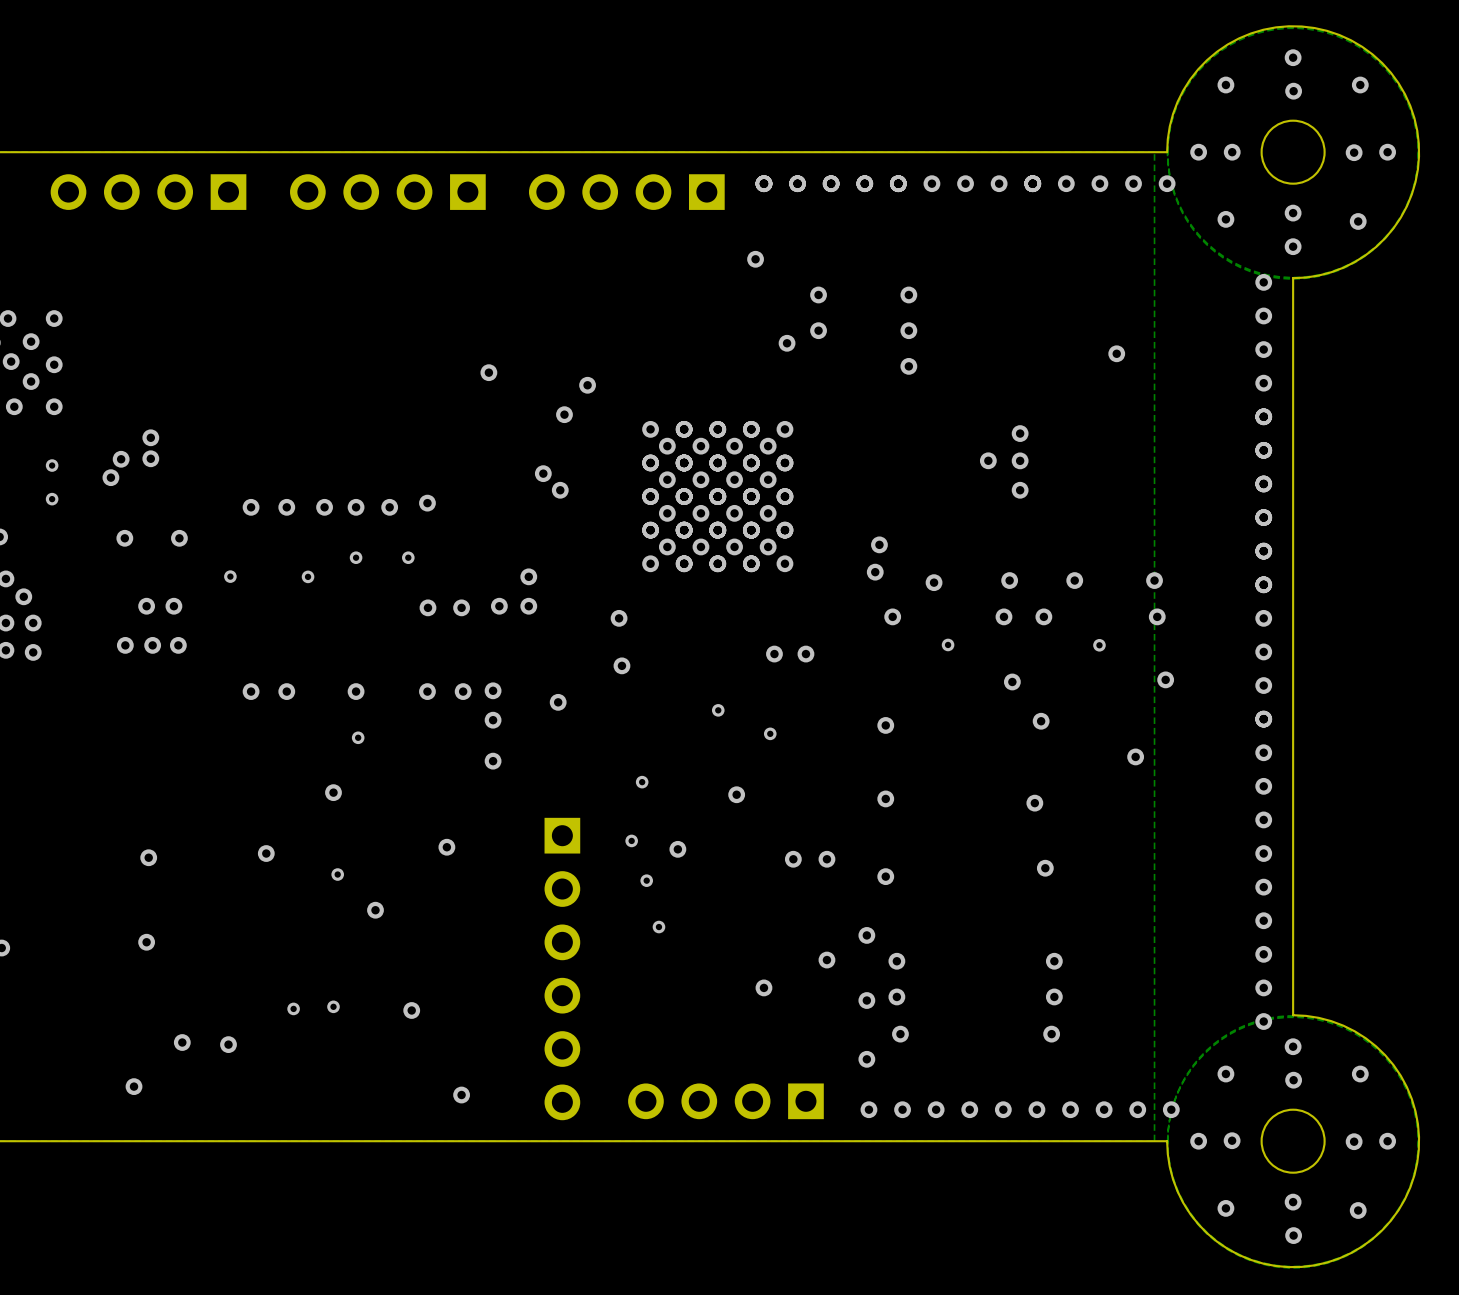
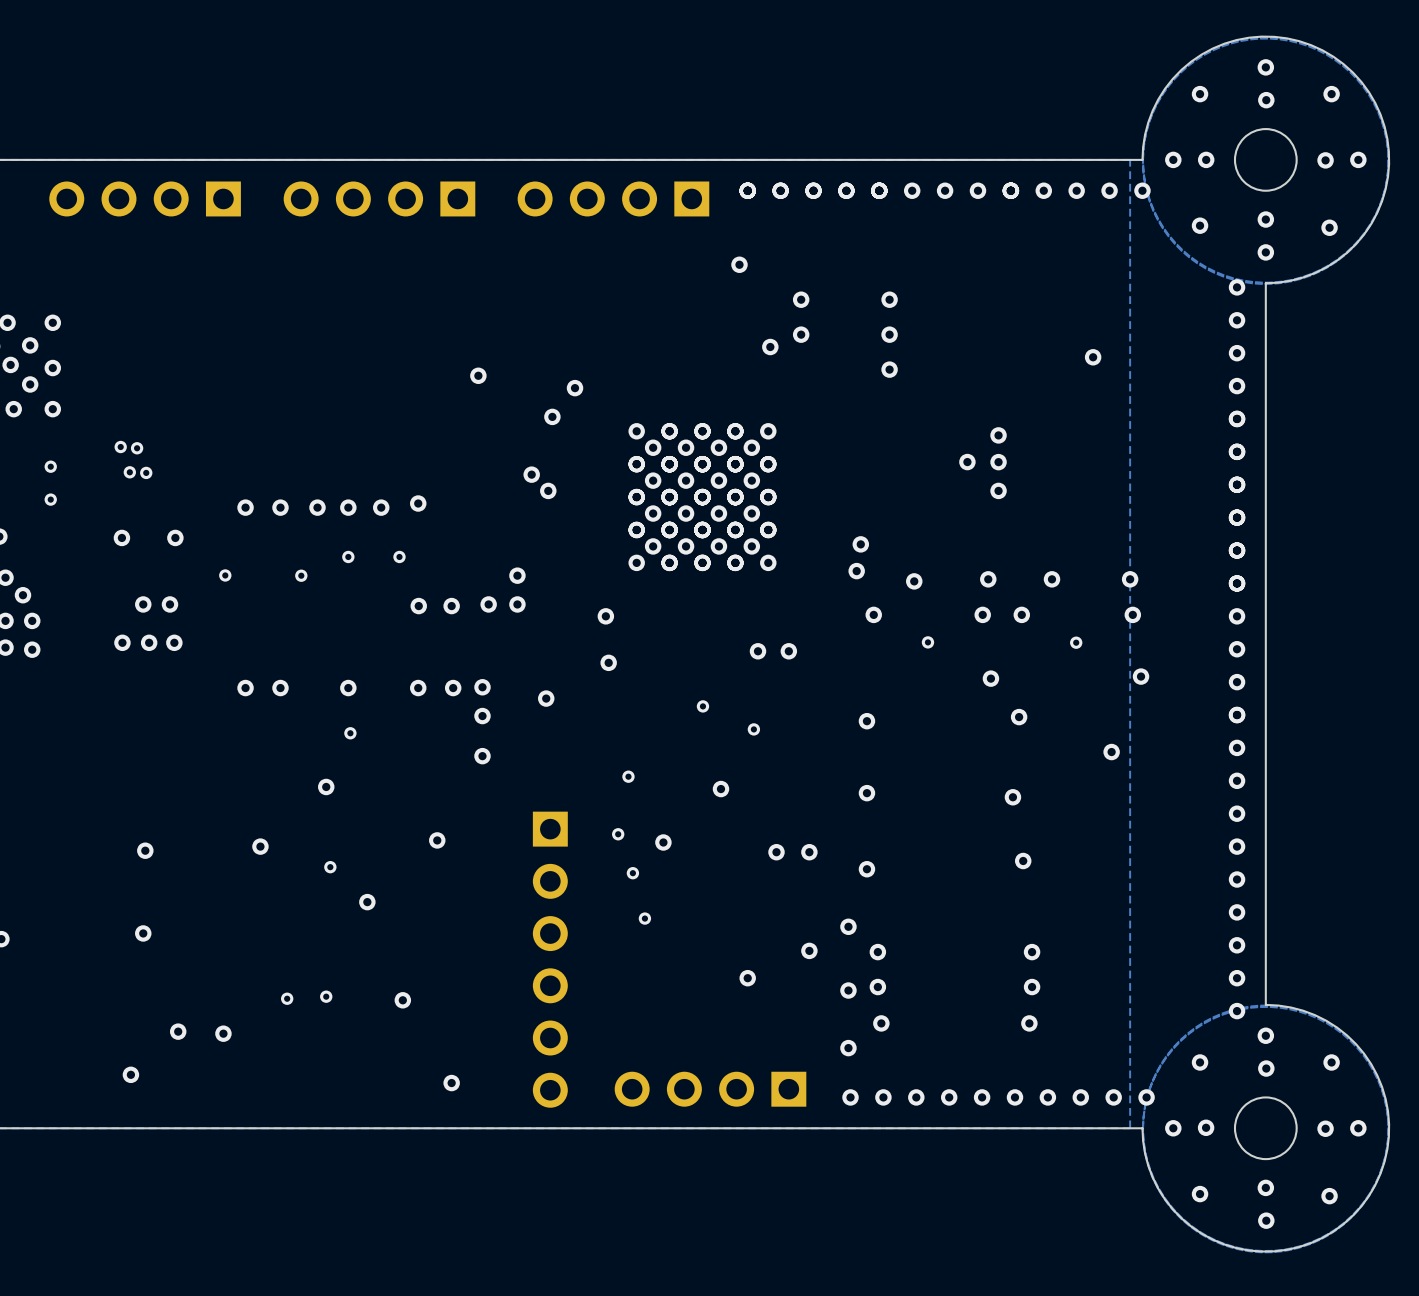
via: (150, 437) -> none
via: none -> (120, 447)
via: none -> (137, 448)
via: (150, 458) -> none
via: (121, 459) -> none
via: none -> (129, 472)
via: none -> (146, 472)
via: (110, 477) -> none

